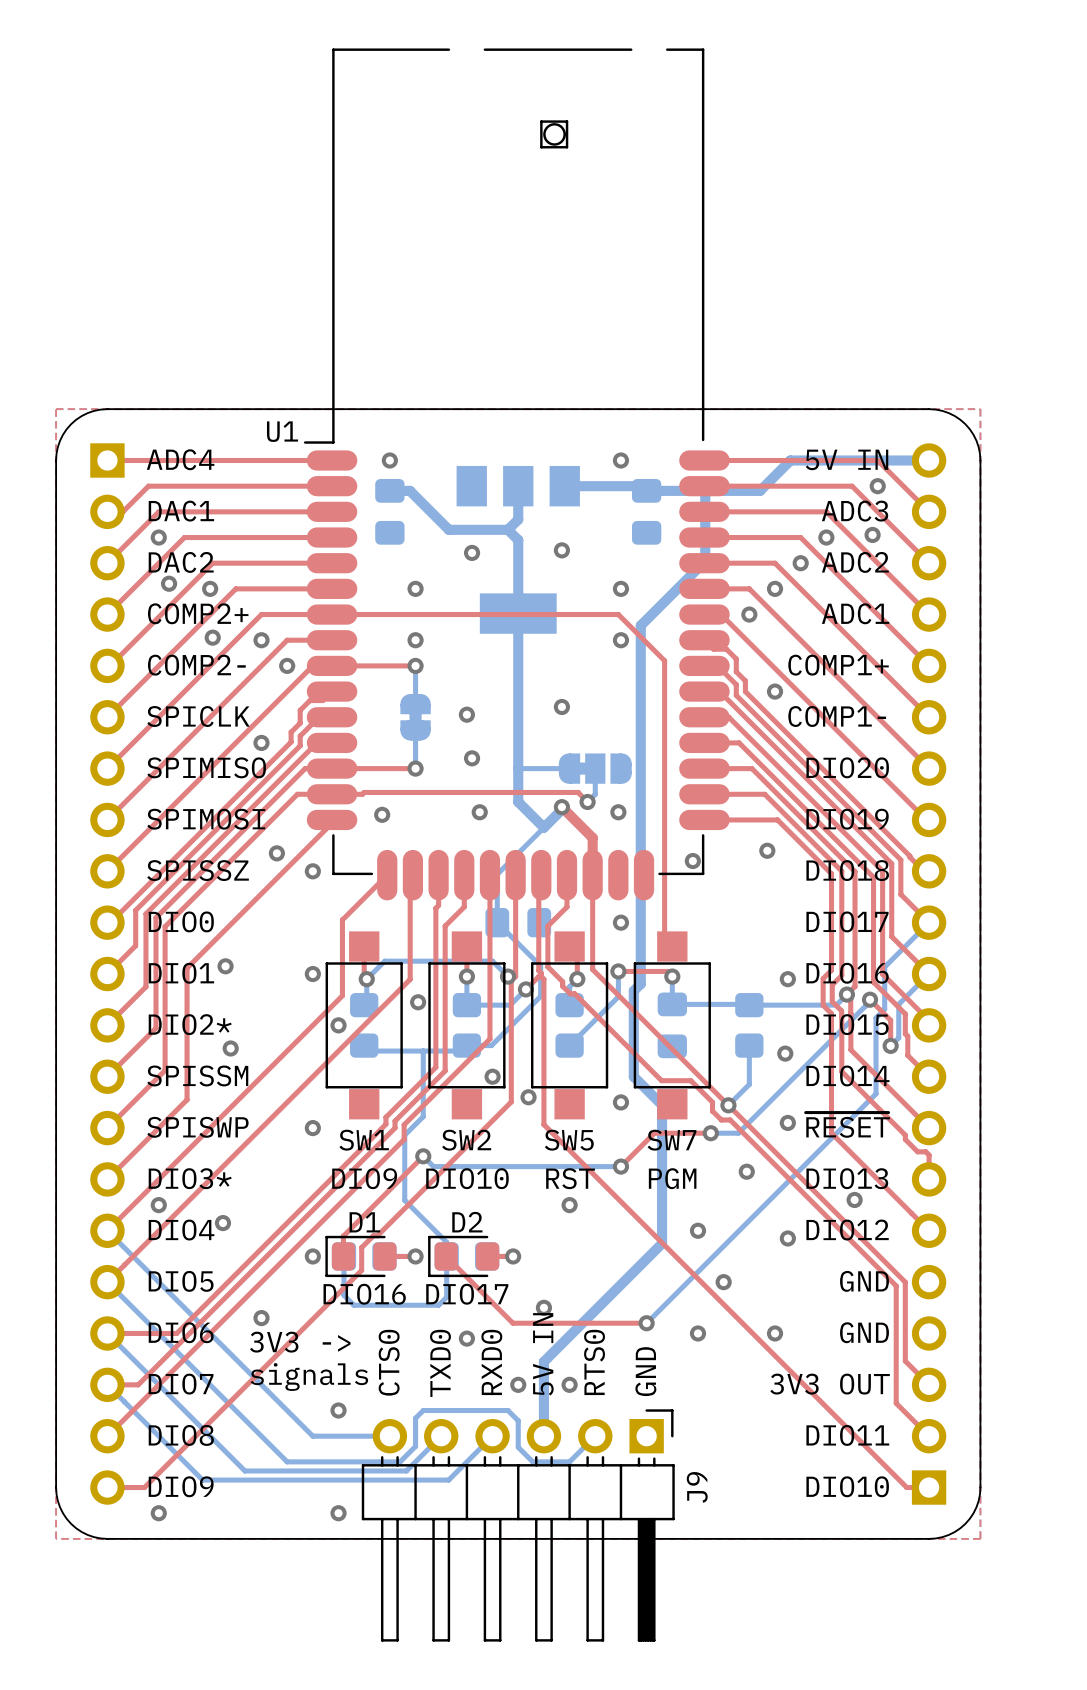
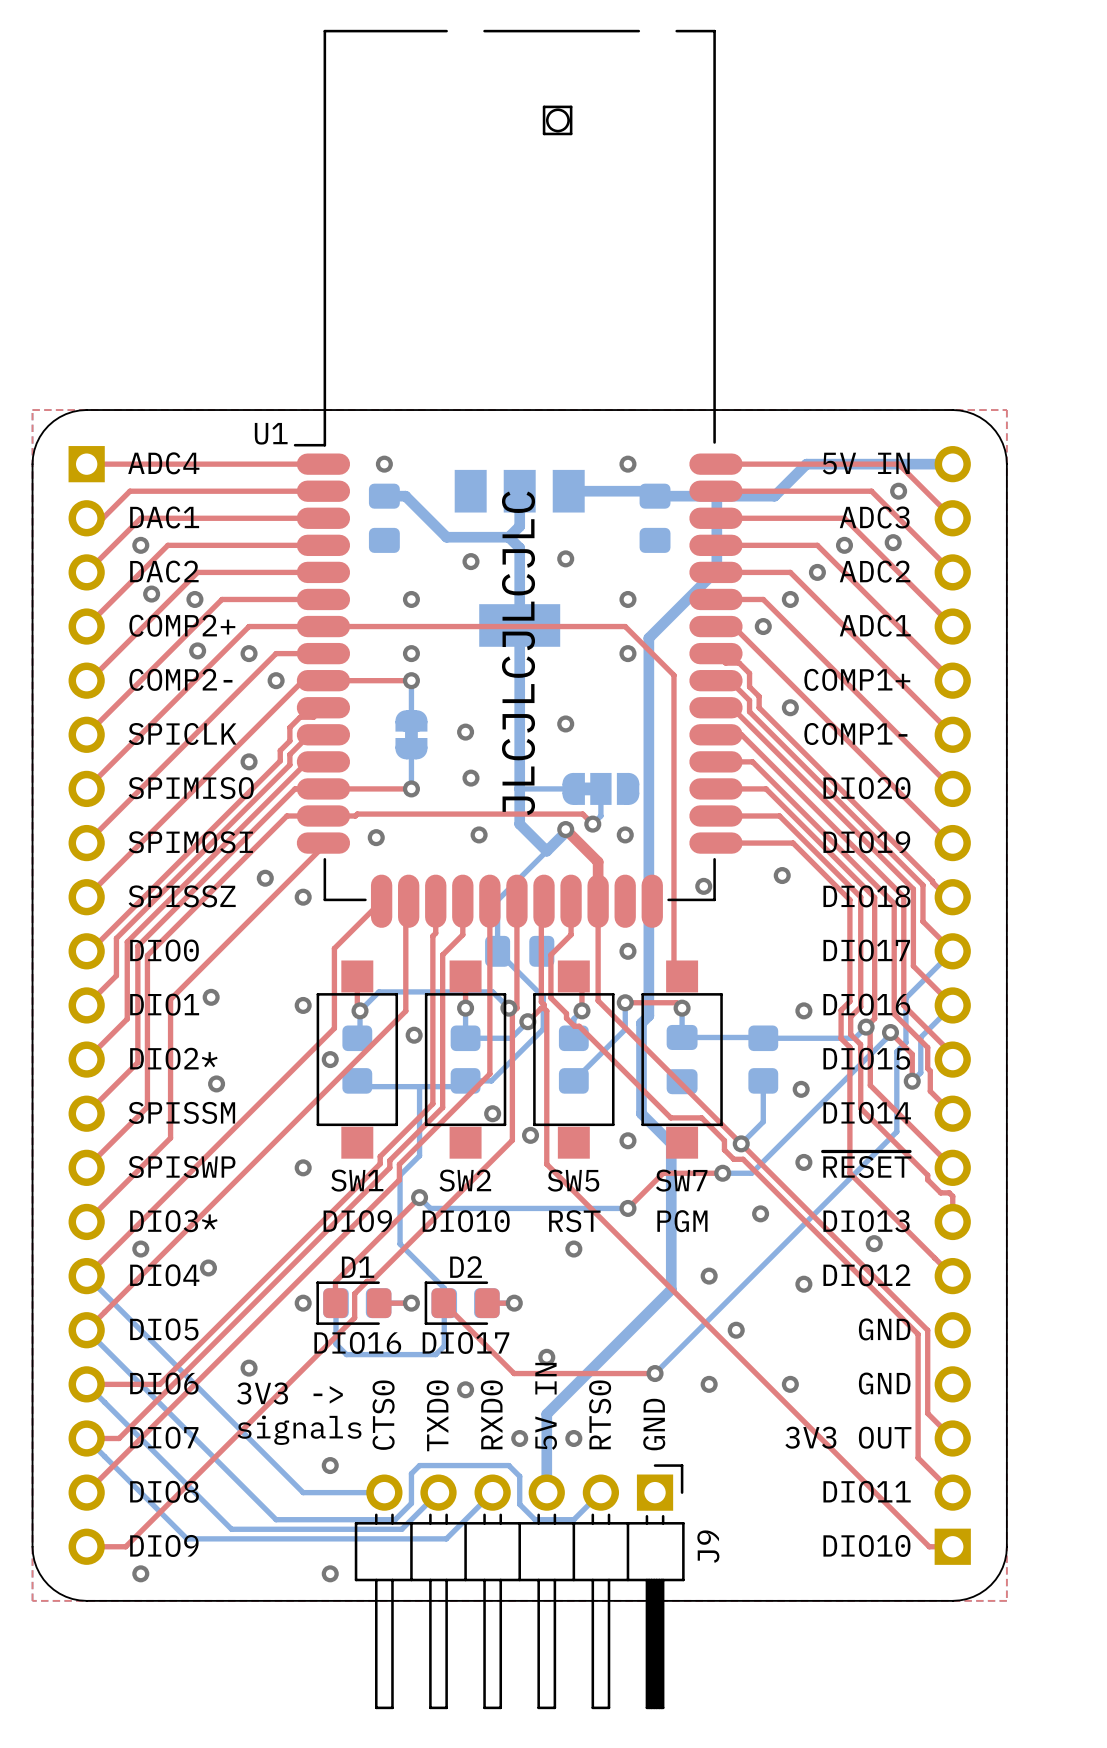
text: none -> JLCJLCJLCJLC (518, 653)

